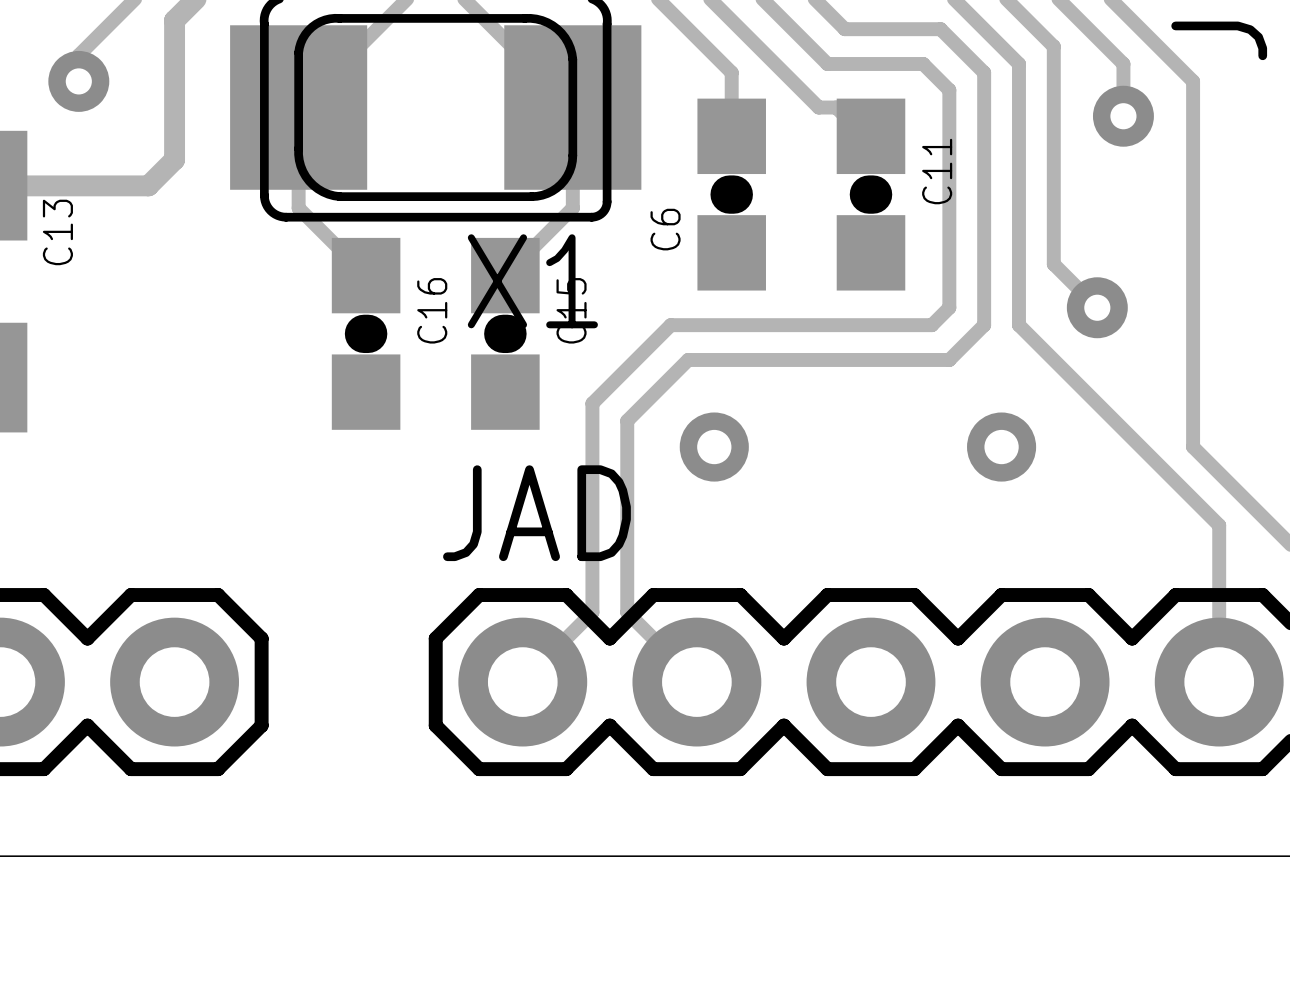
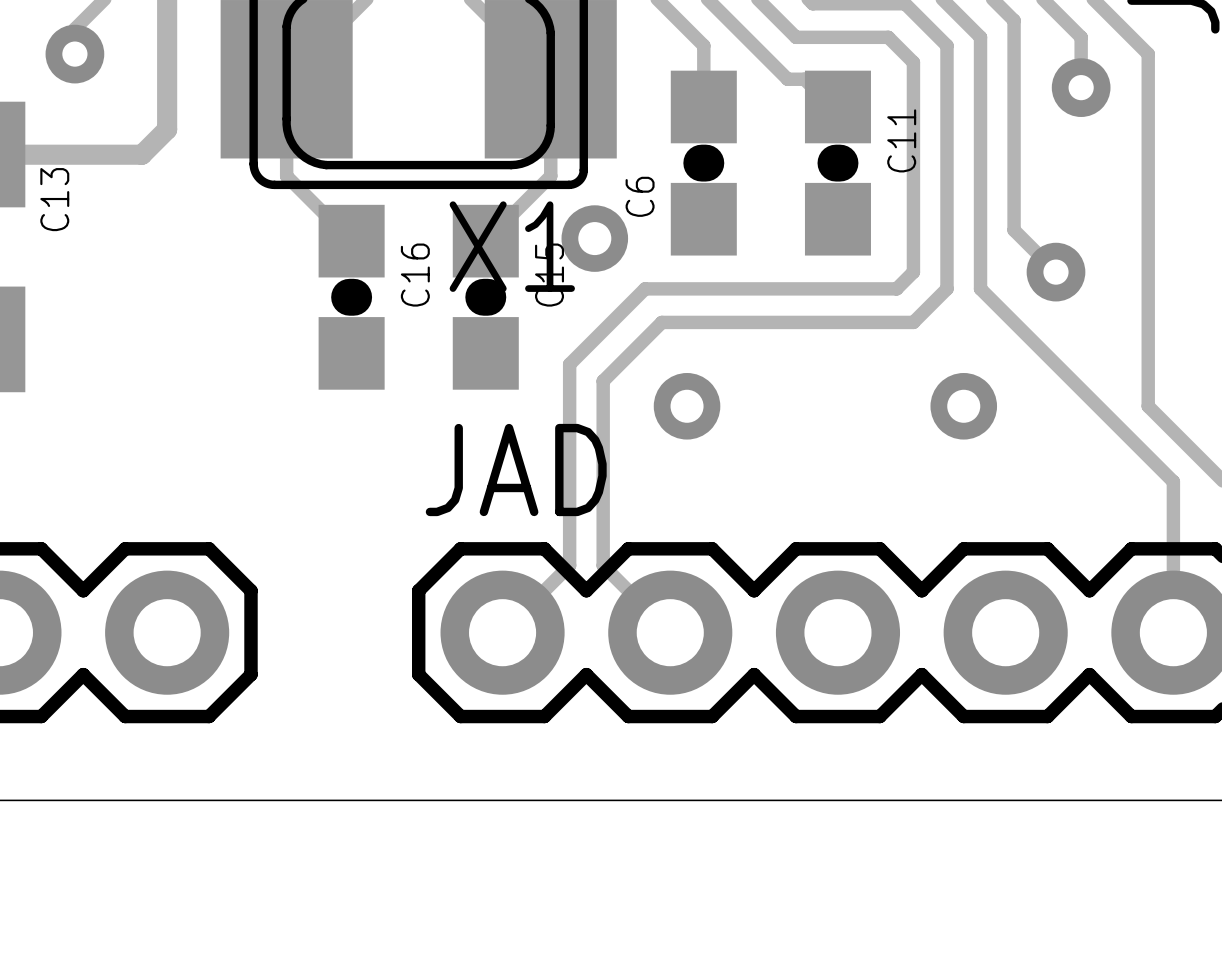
via: none -> (594, 238)

